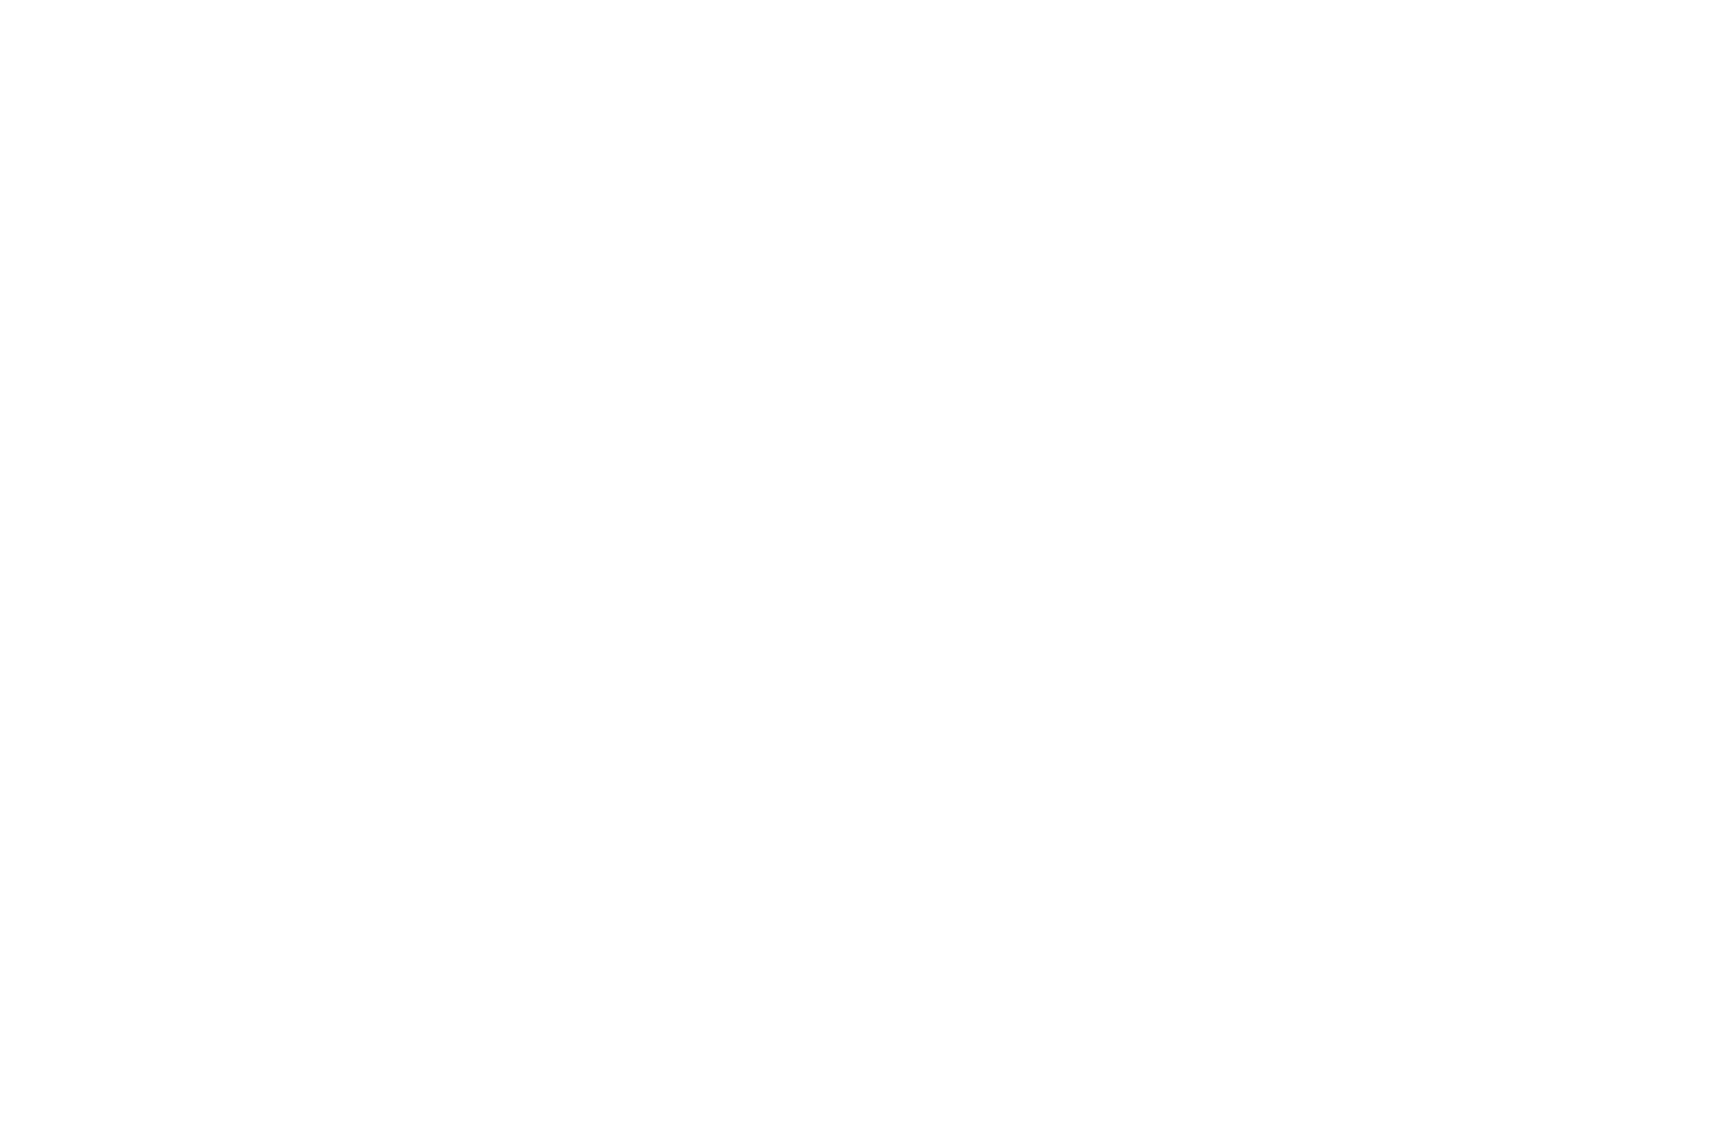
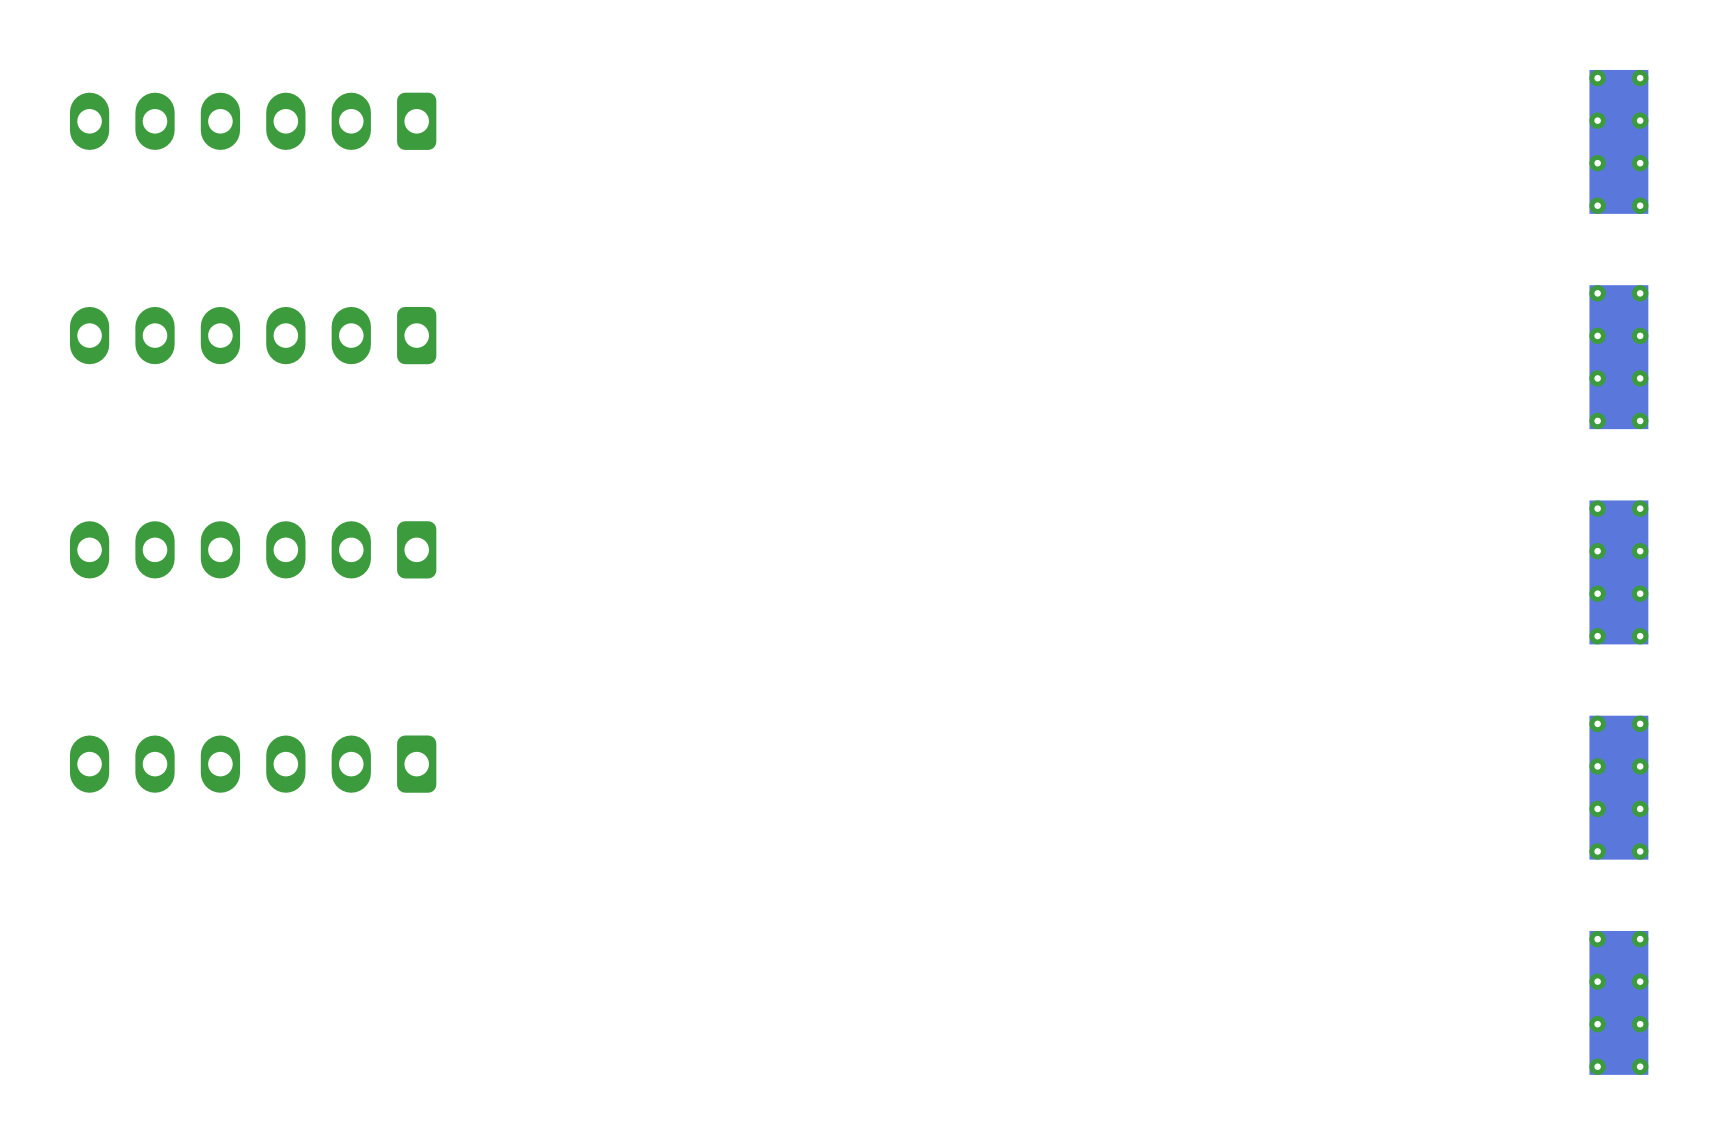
part: none -> (253, 121)
part: none -> (1618, 141)
part: none -> (253, 335)
part: none -> (1618, 357)
part: none -> (253, 549)
part: none -> (1618, 572)
part: none -> (253, 764)
part: none -> (1618, 787)
part: none -> (1618, 1002)

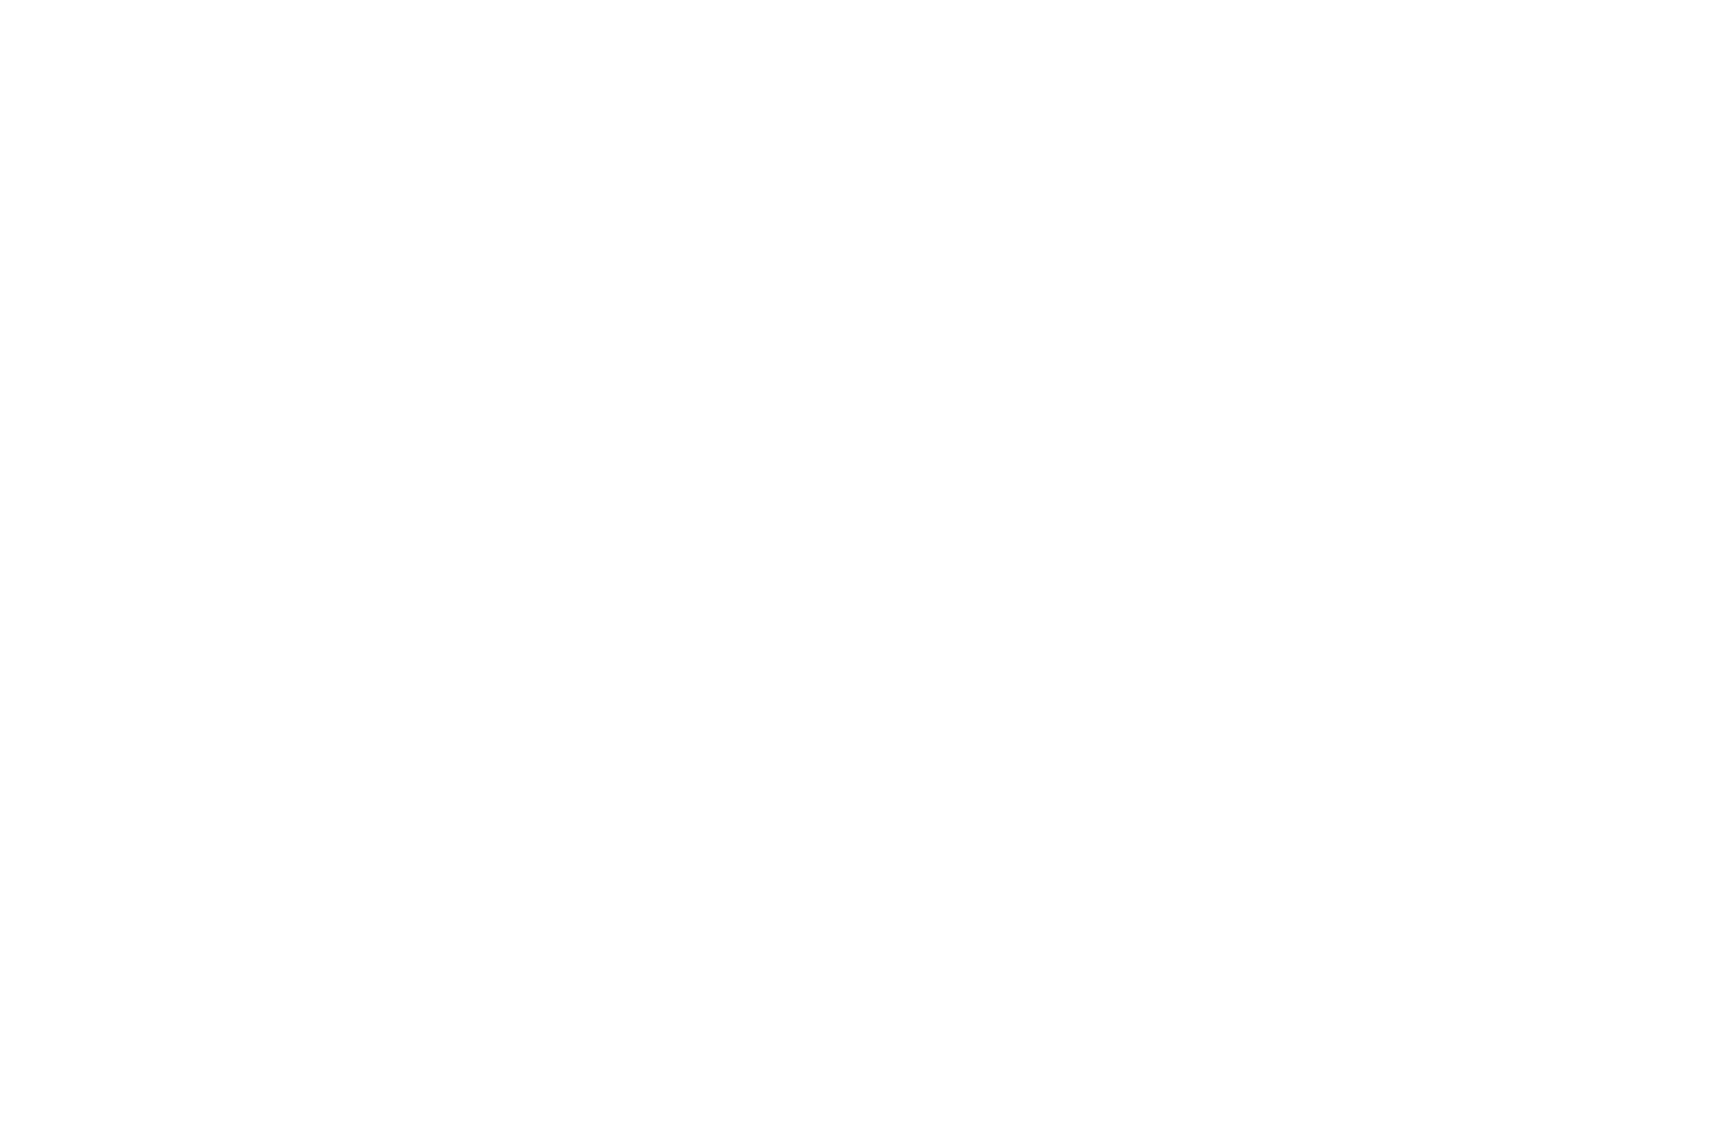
part: (253, 121) -> none
part: (1618, 141) -> none
part: (253, 335) -> none
part: (1618, 357) -> none
part: (253, 549) -> none
part: (1618, 572) -> none
part: (253, 764) -> none
part: (1618, 787) -> none
part: (1618, 1002) -> none

